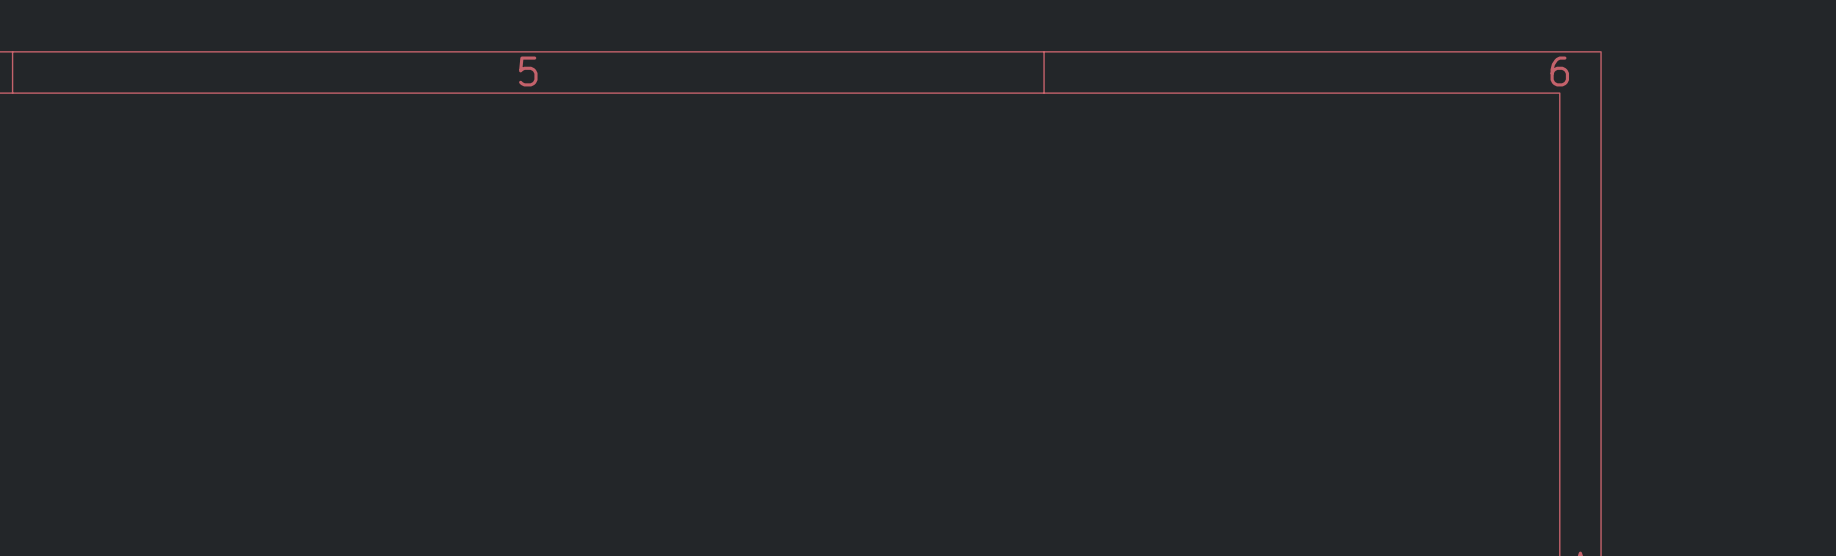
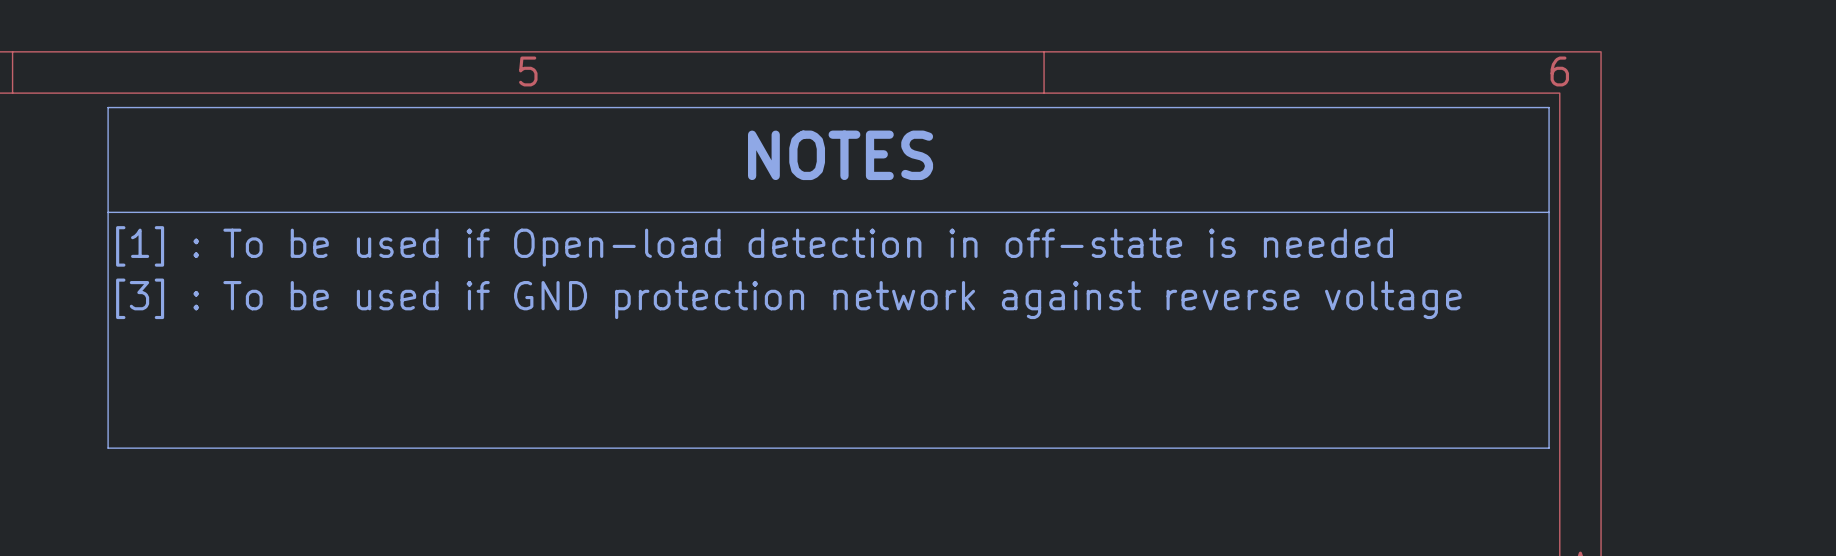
line: none -> (108, 107) (1549, 107) (1549, 448) (108, 448) (108, 107)
text: none -> NOTES (840, 155)
line: none -> (108, 212) (1549, 212)
text: none -> [1] : To be used if Open-load detection in off-state is needed (754, 246)
text: none -> [3] : To be used if GND protection network against reverse voltage (788, 298)

